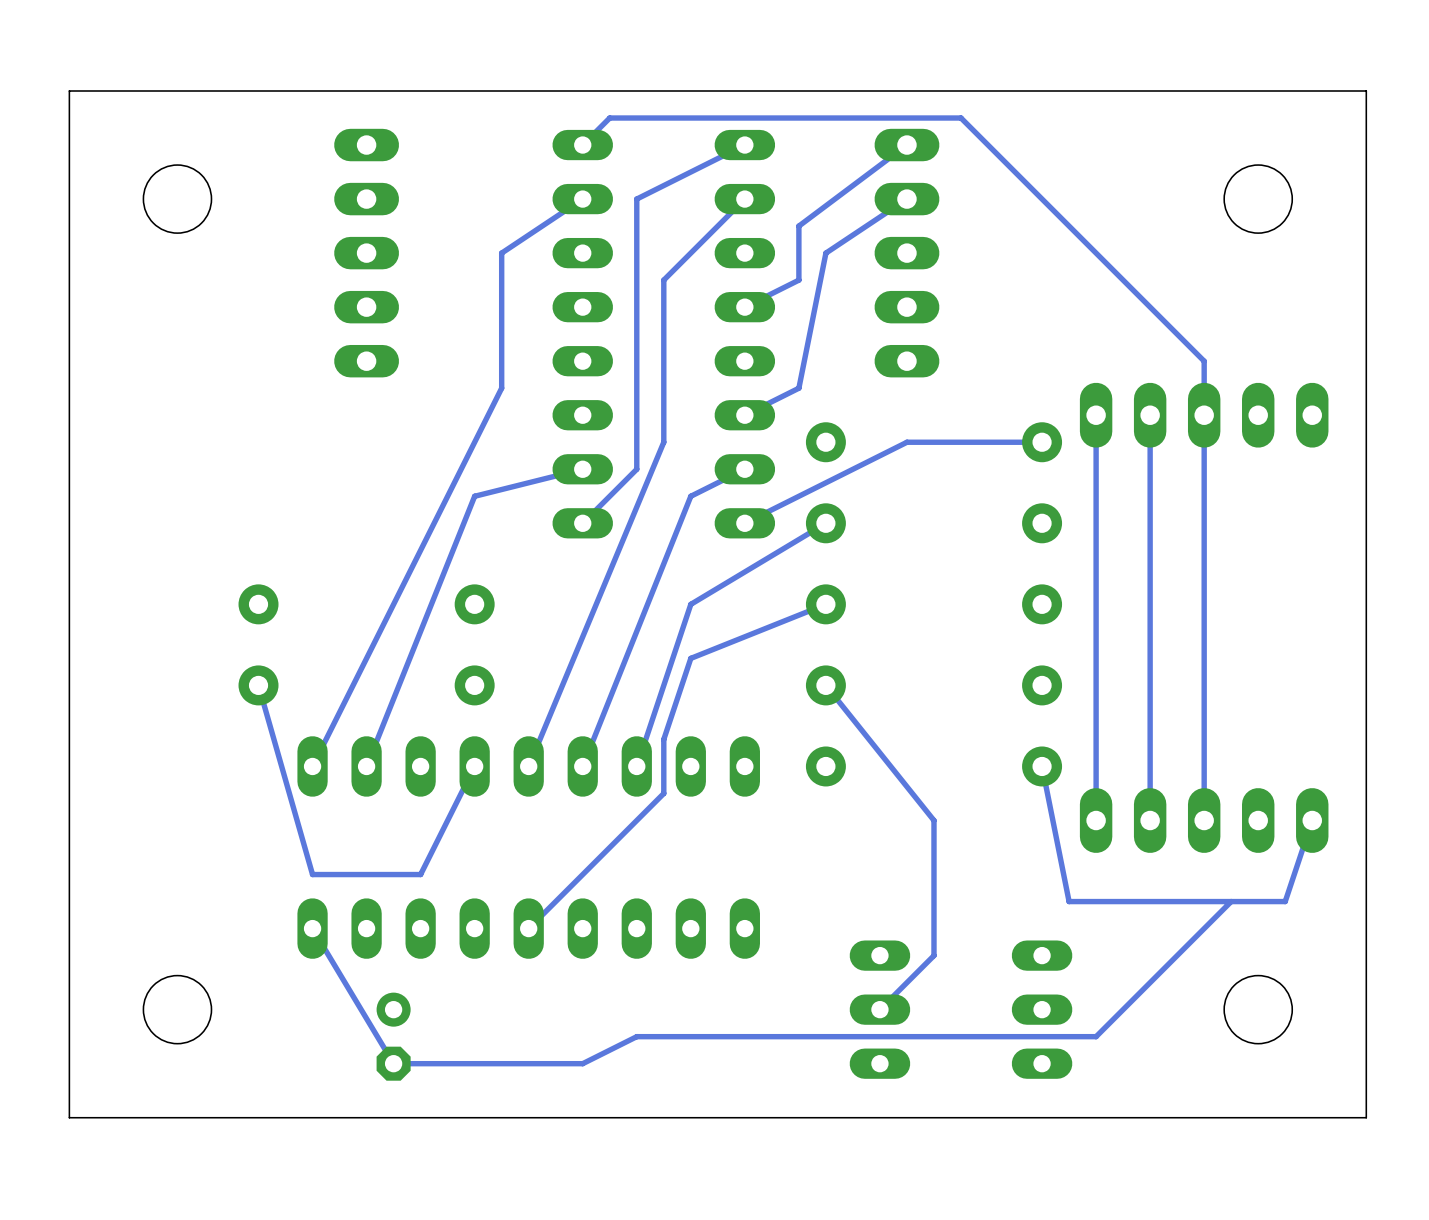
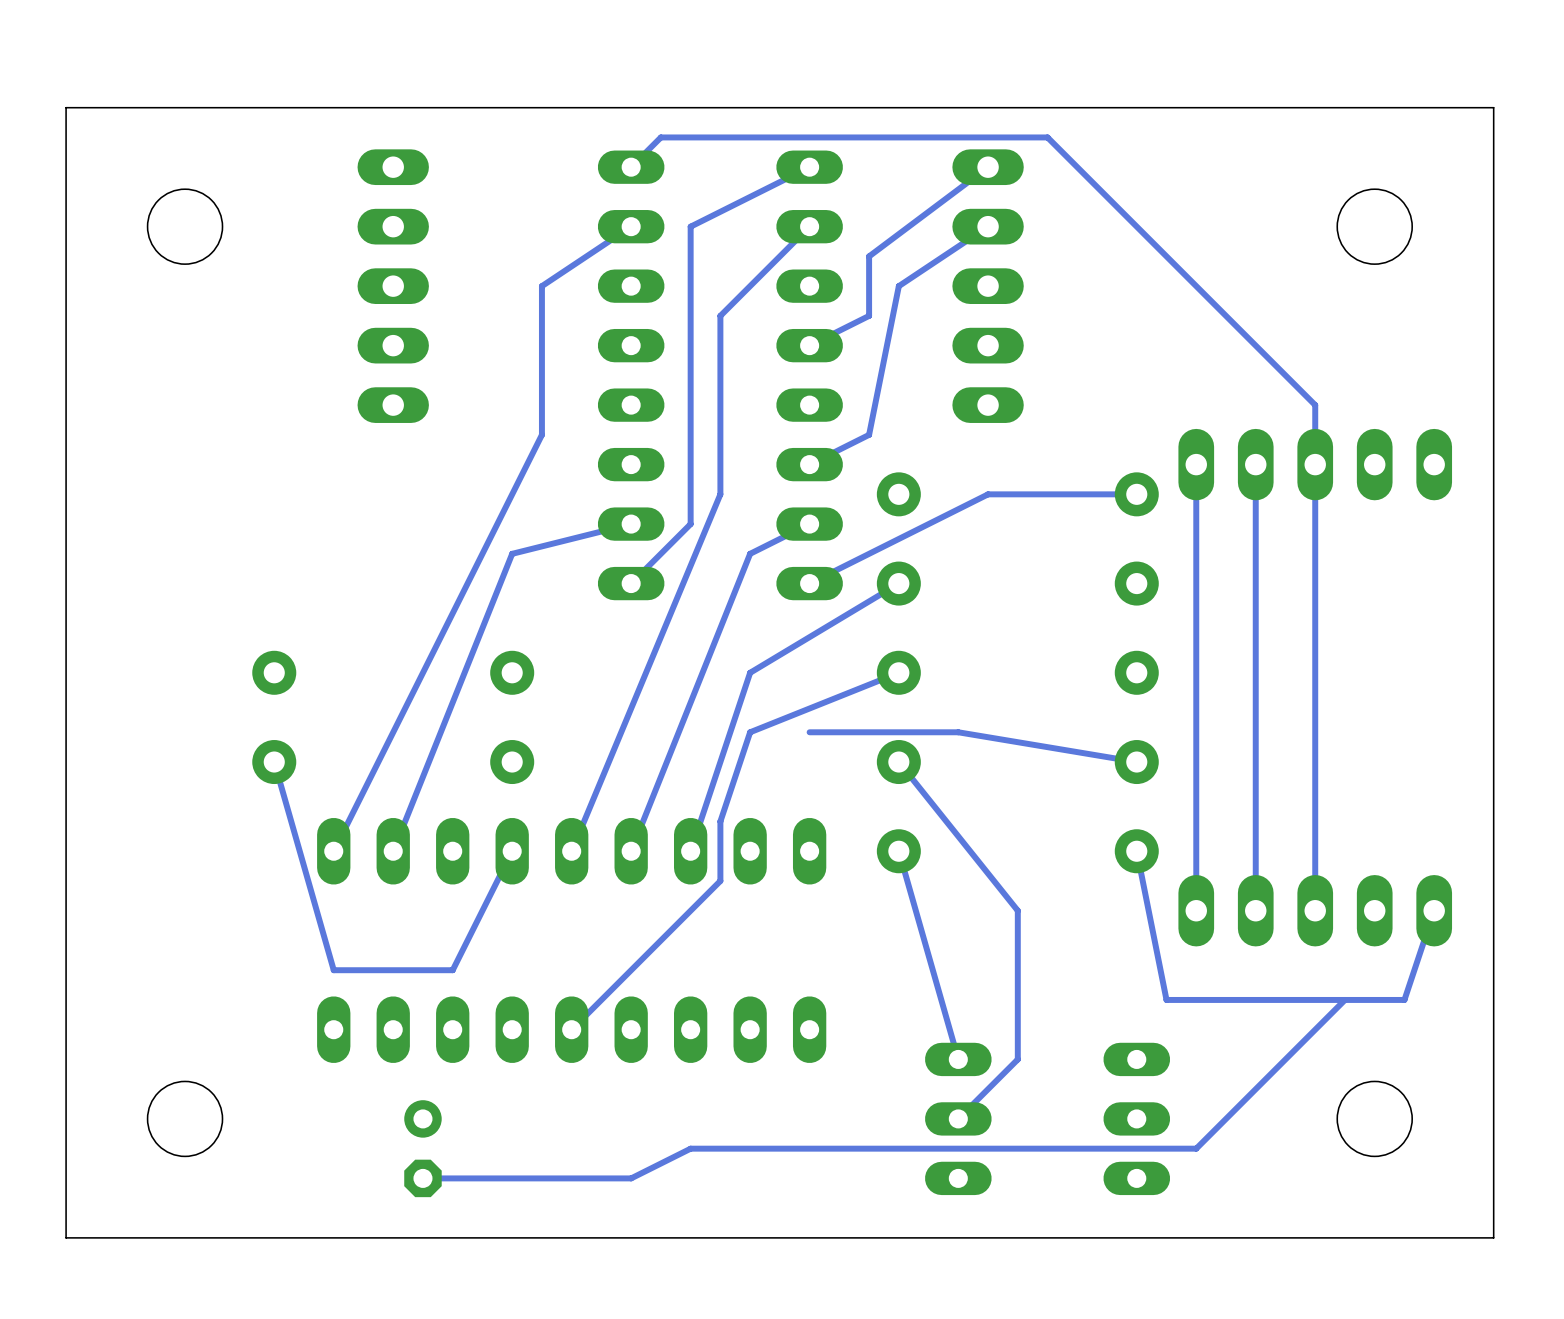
track: none -> (809, 732) (958, 732) (1136, 762)
track: none -> (898, 851) (958, 1059)
track: (312, 928) (393, 1063) -> none

